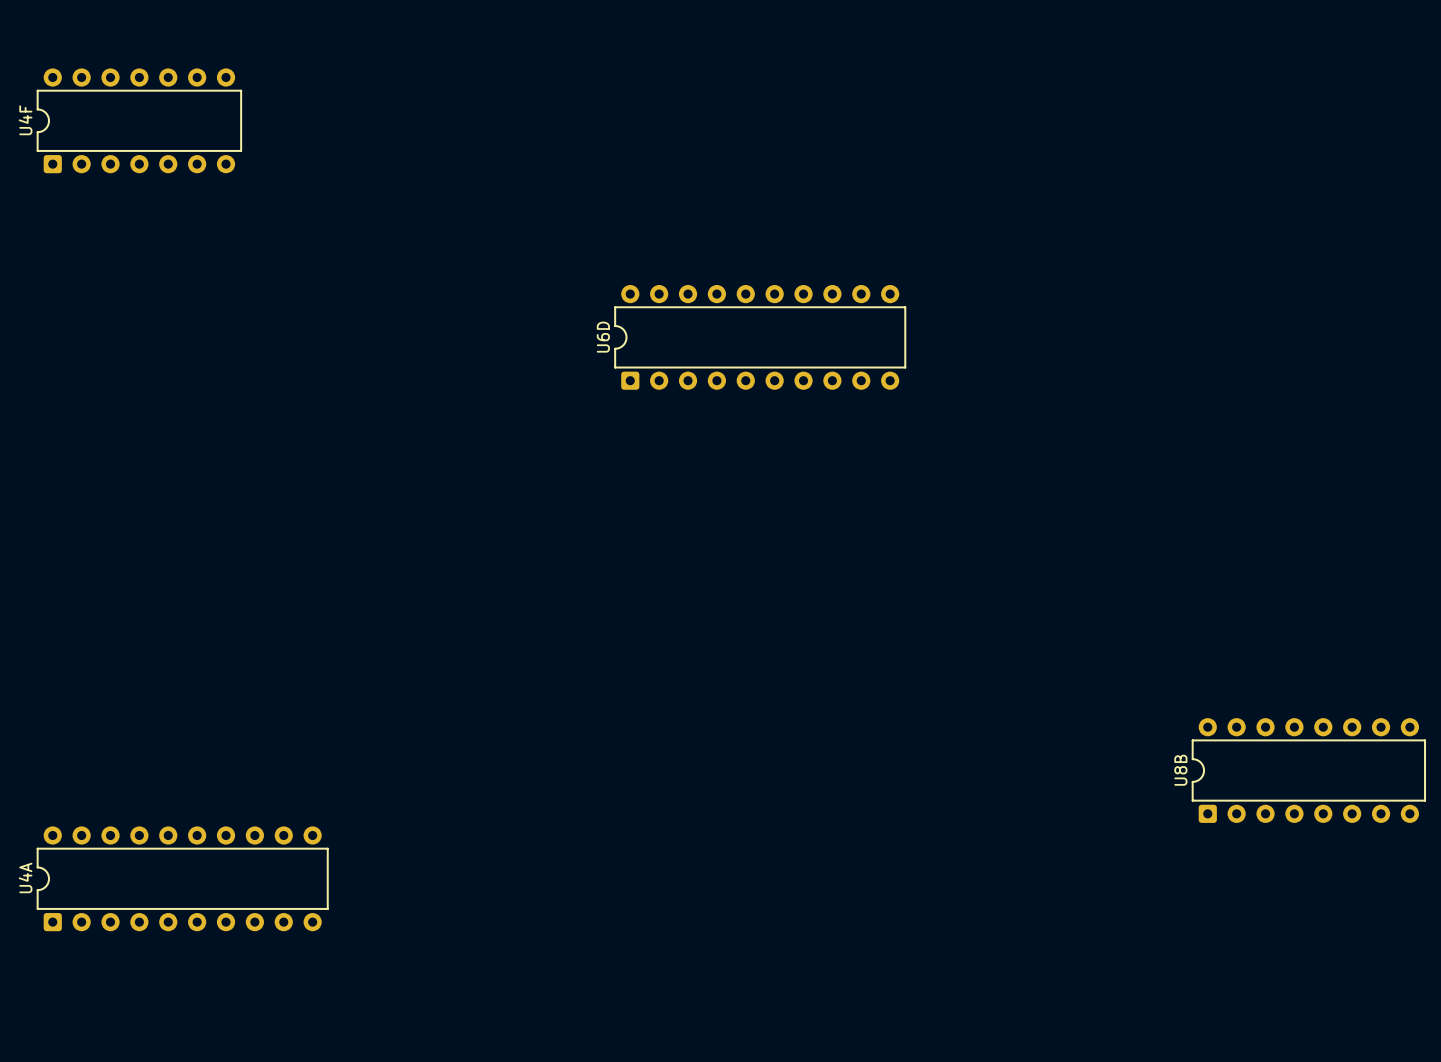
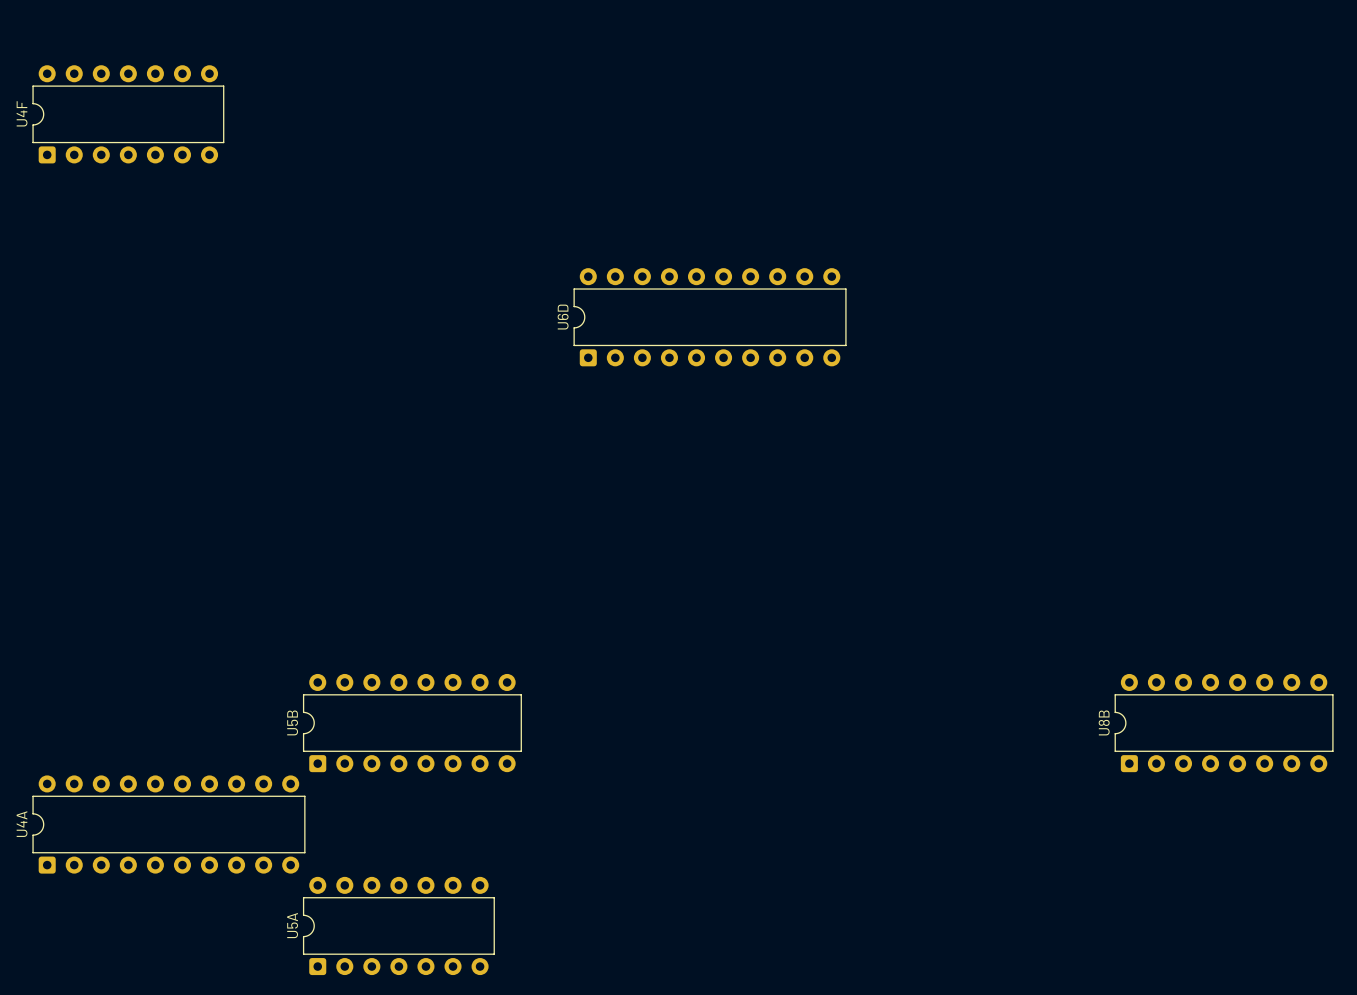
U5B: none -> (412, 723)
U5A: none -> (398, 925)

